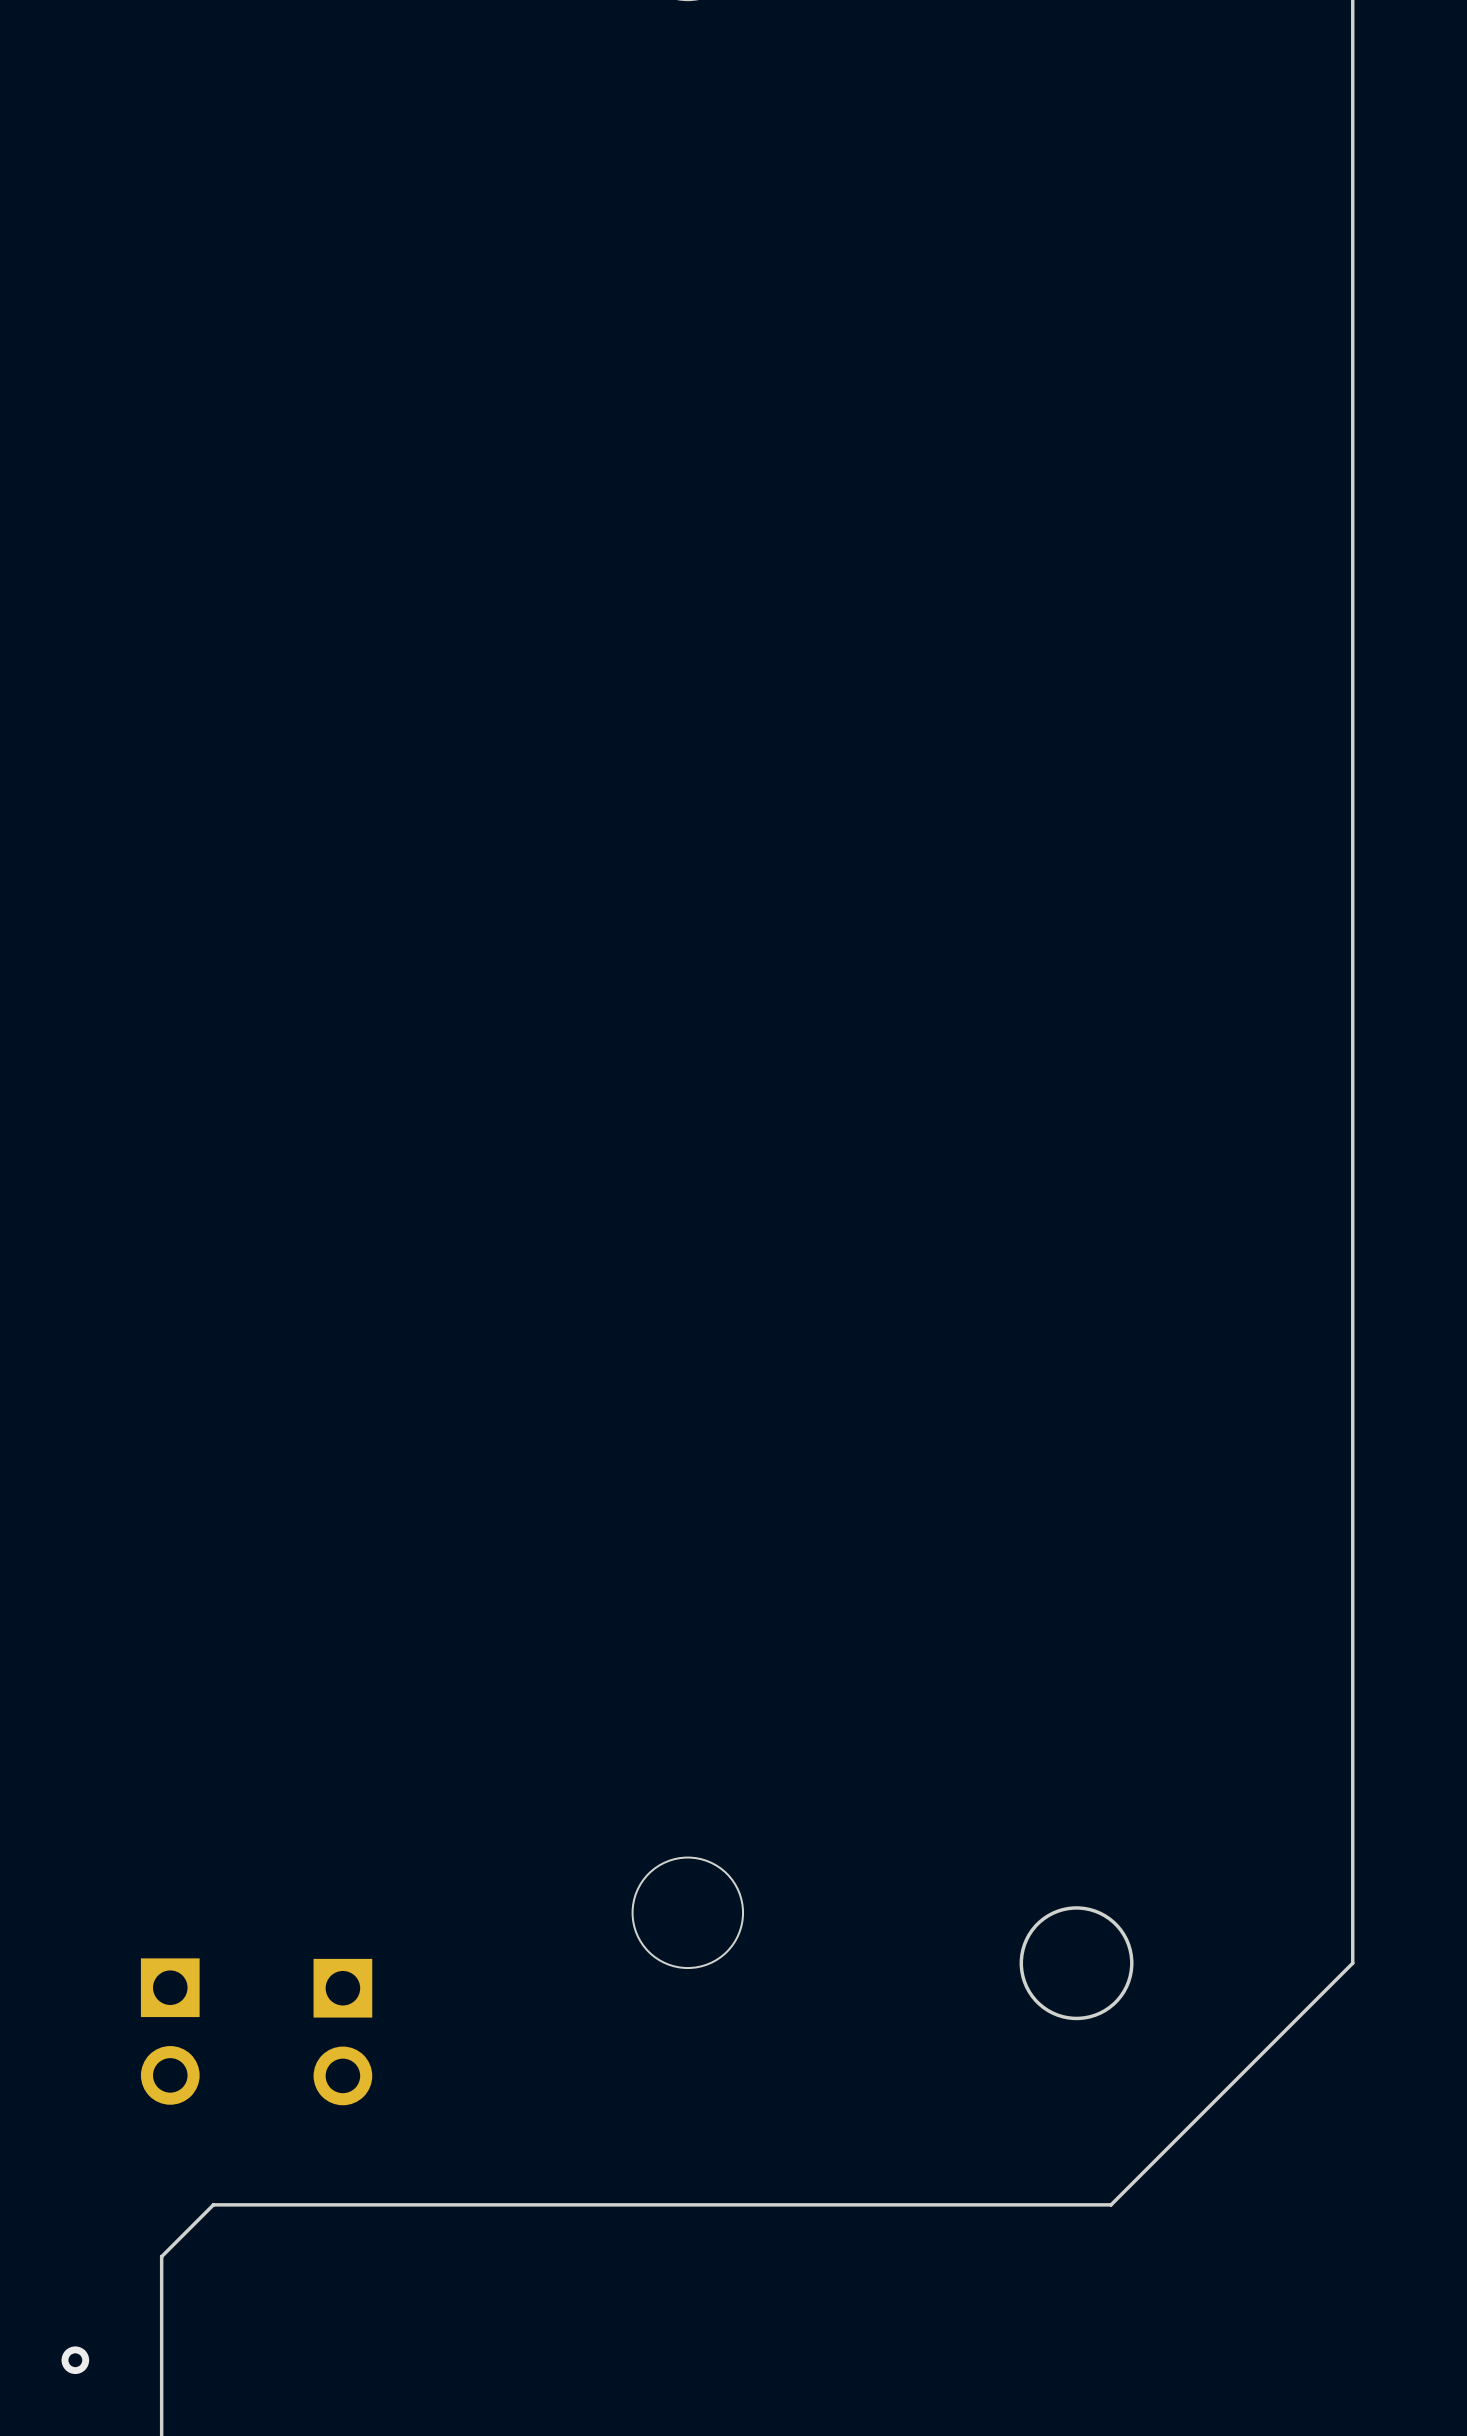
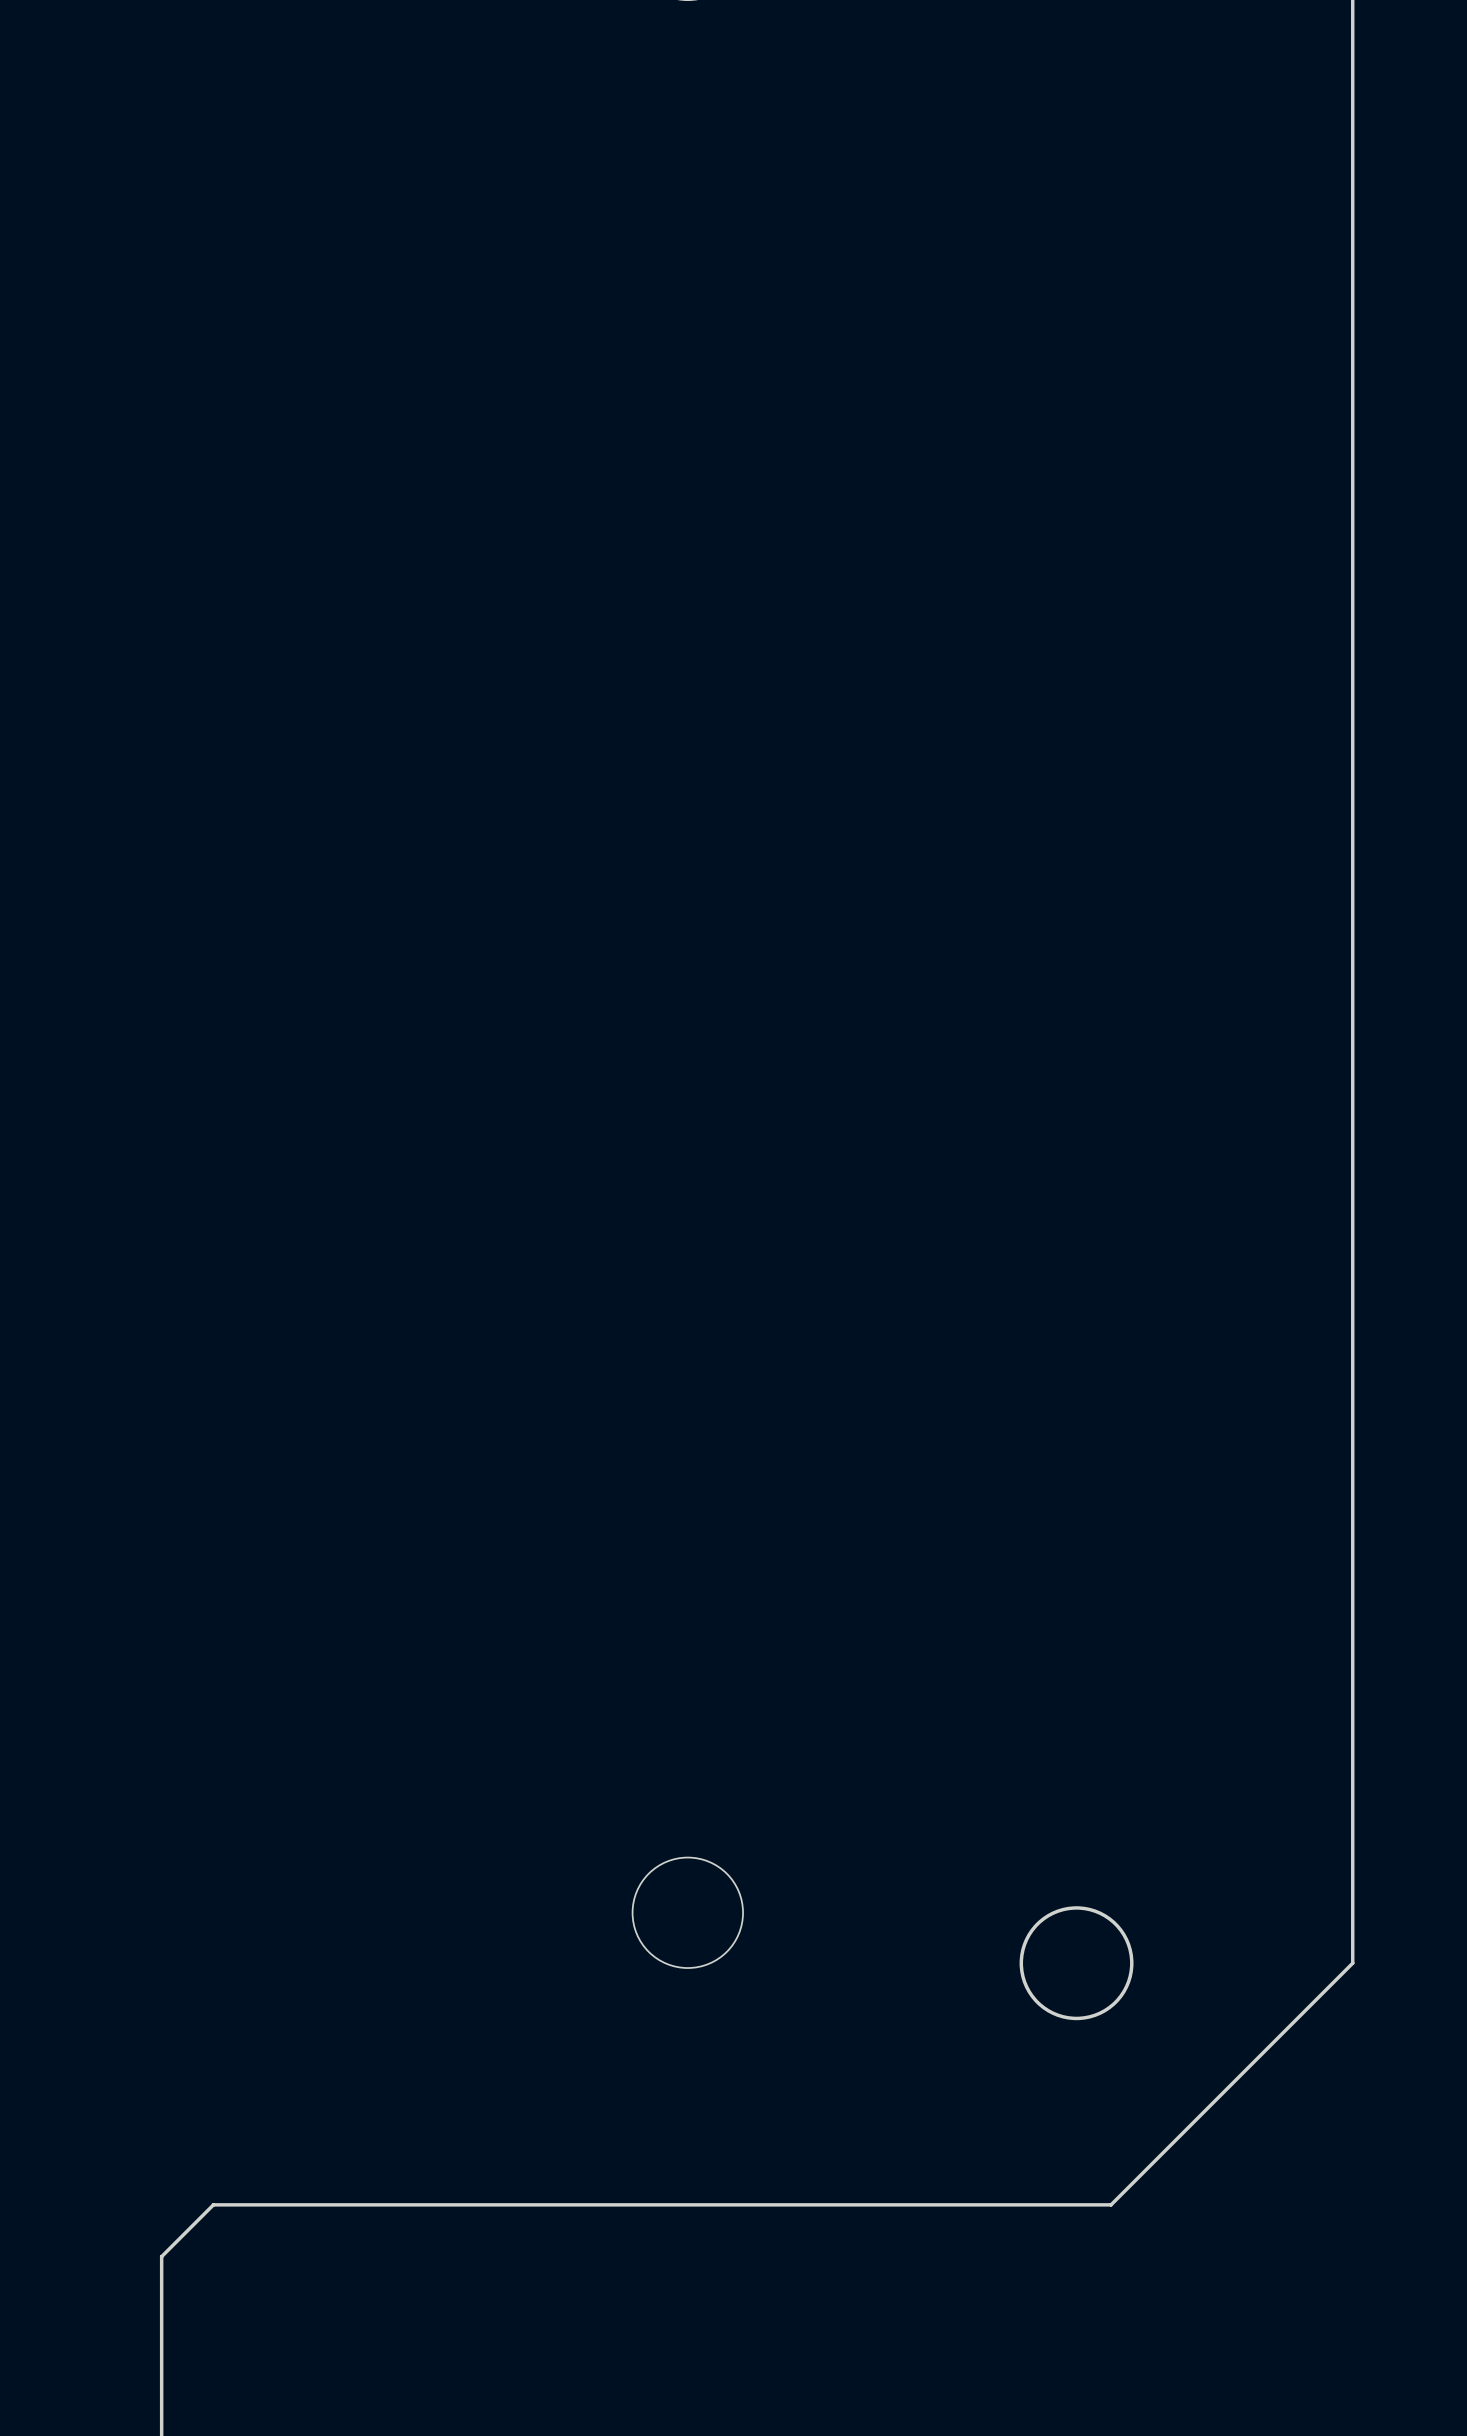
part: (170, 2031) -> none
part: (342, 2032) -> none
via: (75, 2360) -> none

